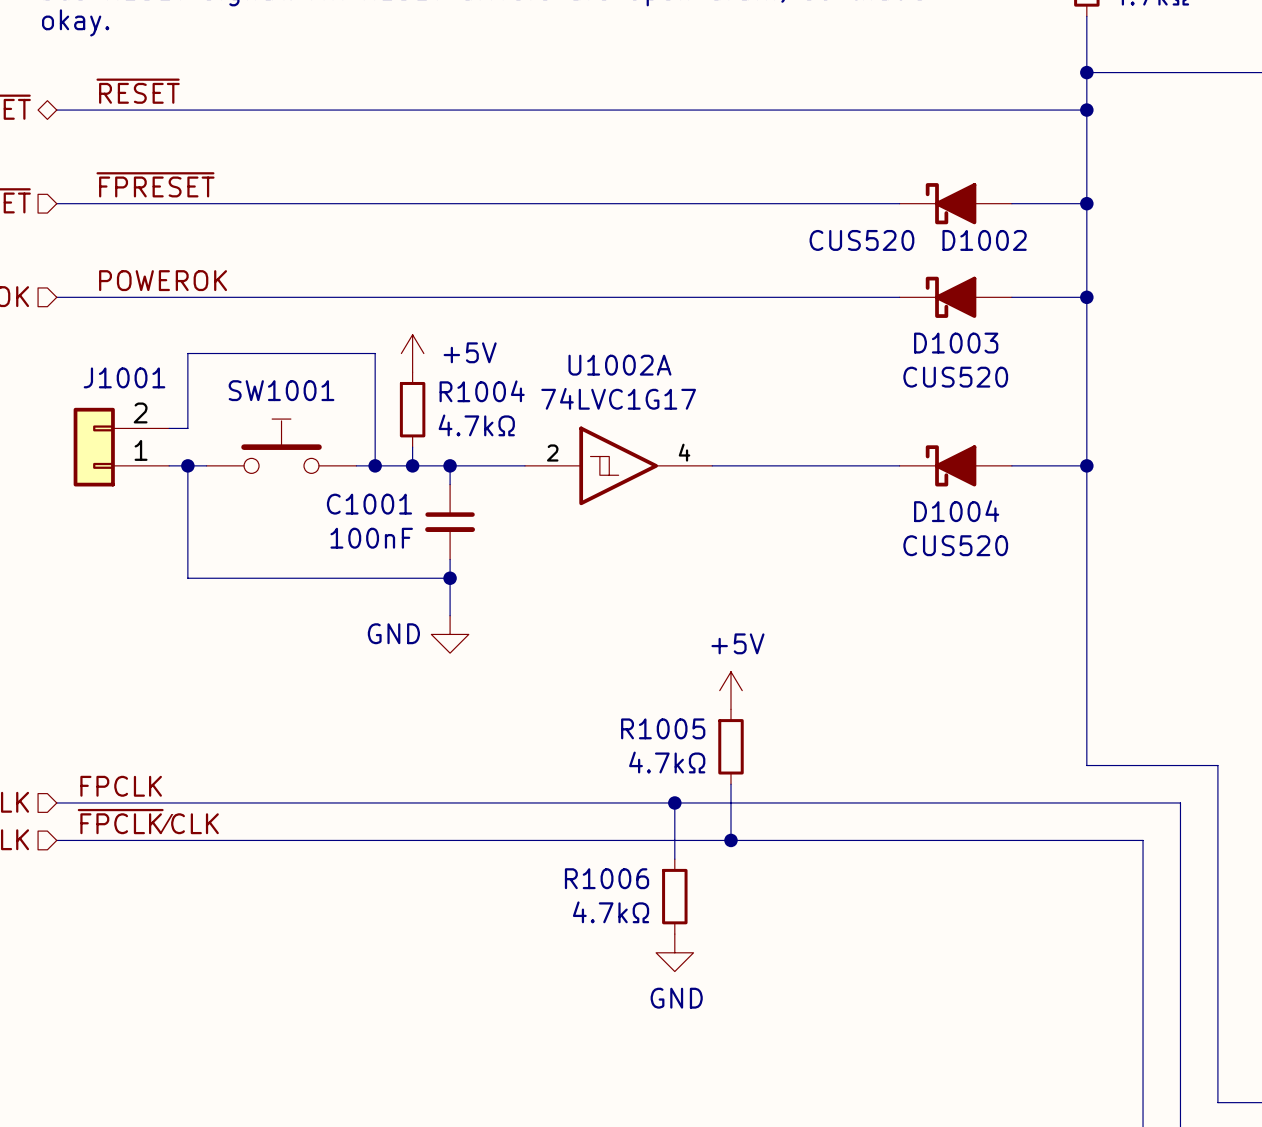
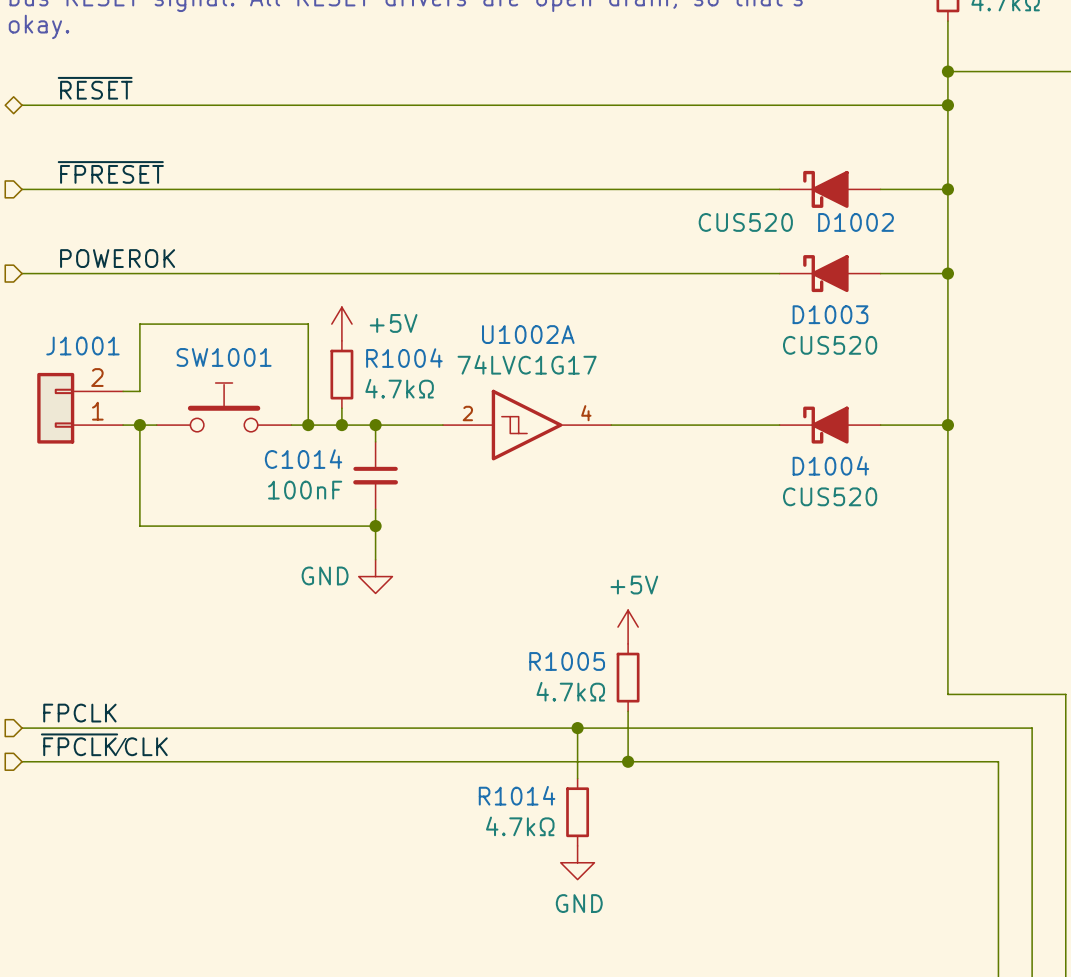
C1001 name: C1001 (369, 504) -> C1014 (303, 459)
R1006 name: R1006 (607, 878) -> R1014 (517, 795)

